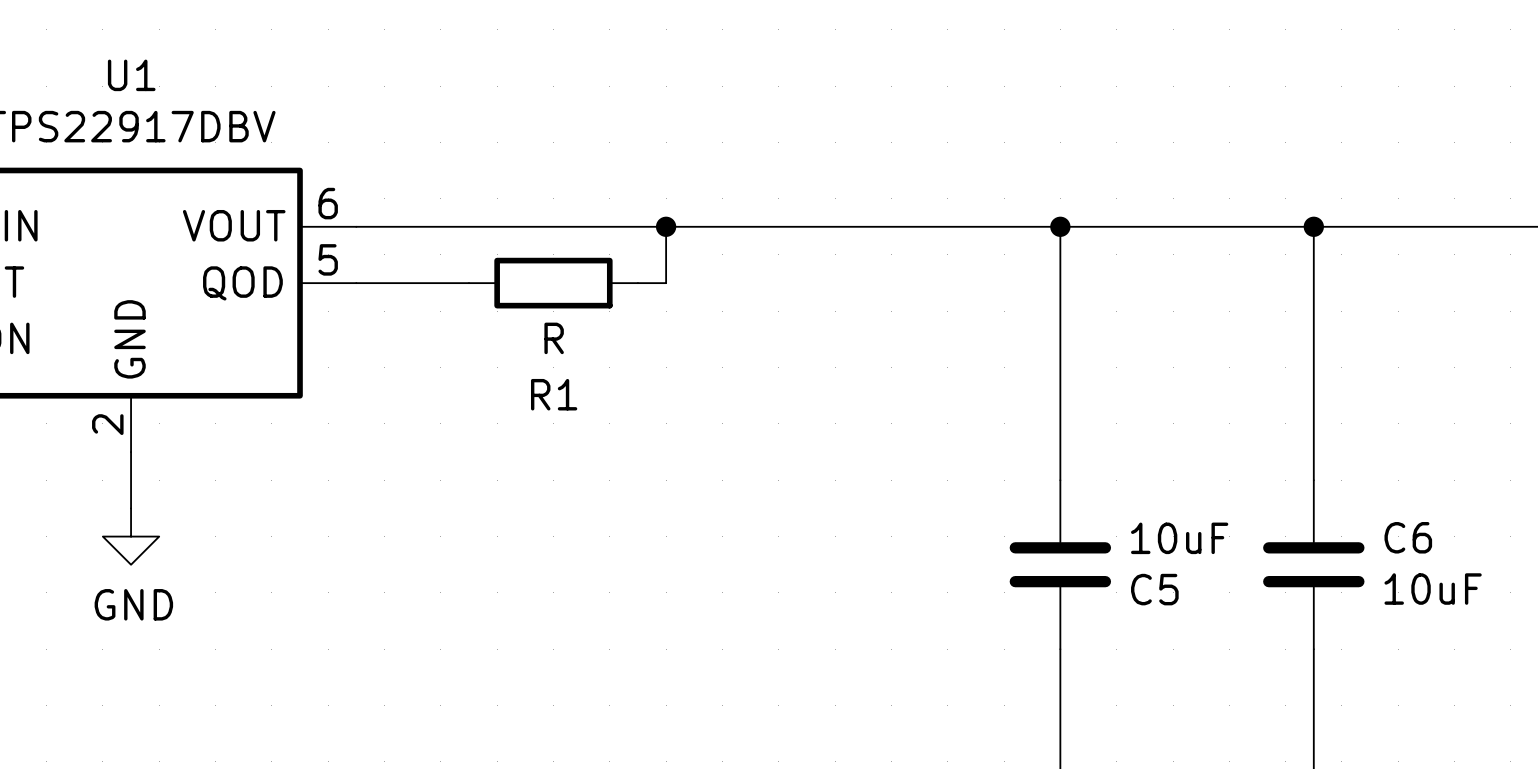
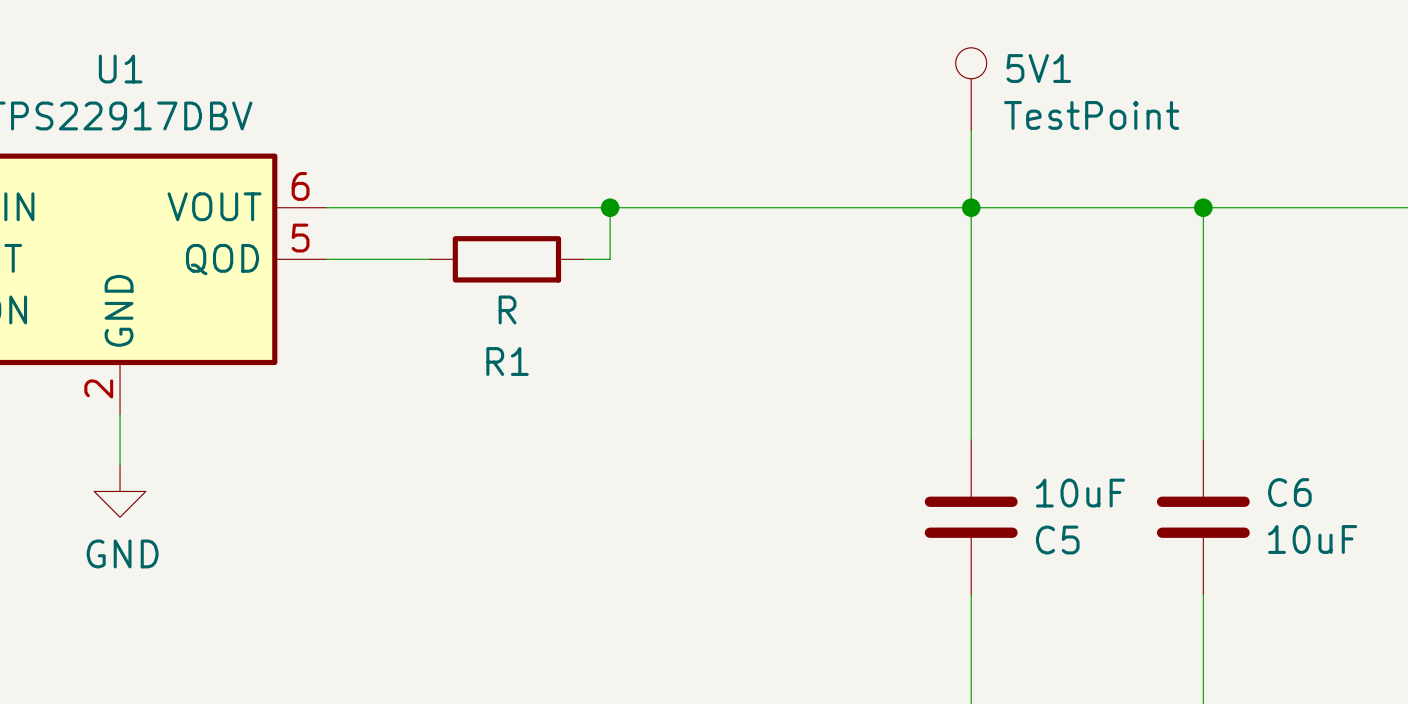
5V1: none -> TestPoint (971, 89)
wire: none -> (971, 130) (971, 207)

